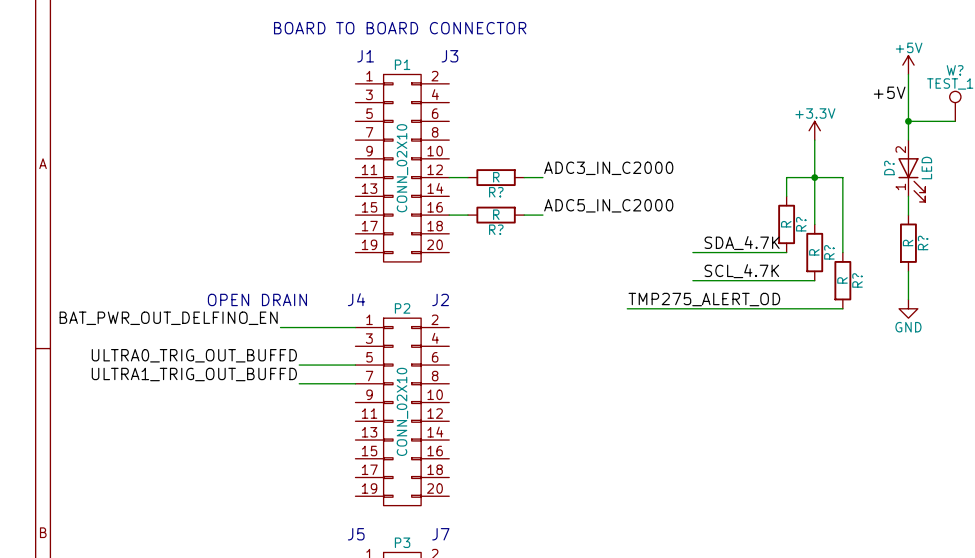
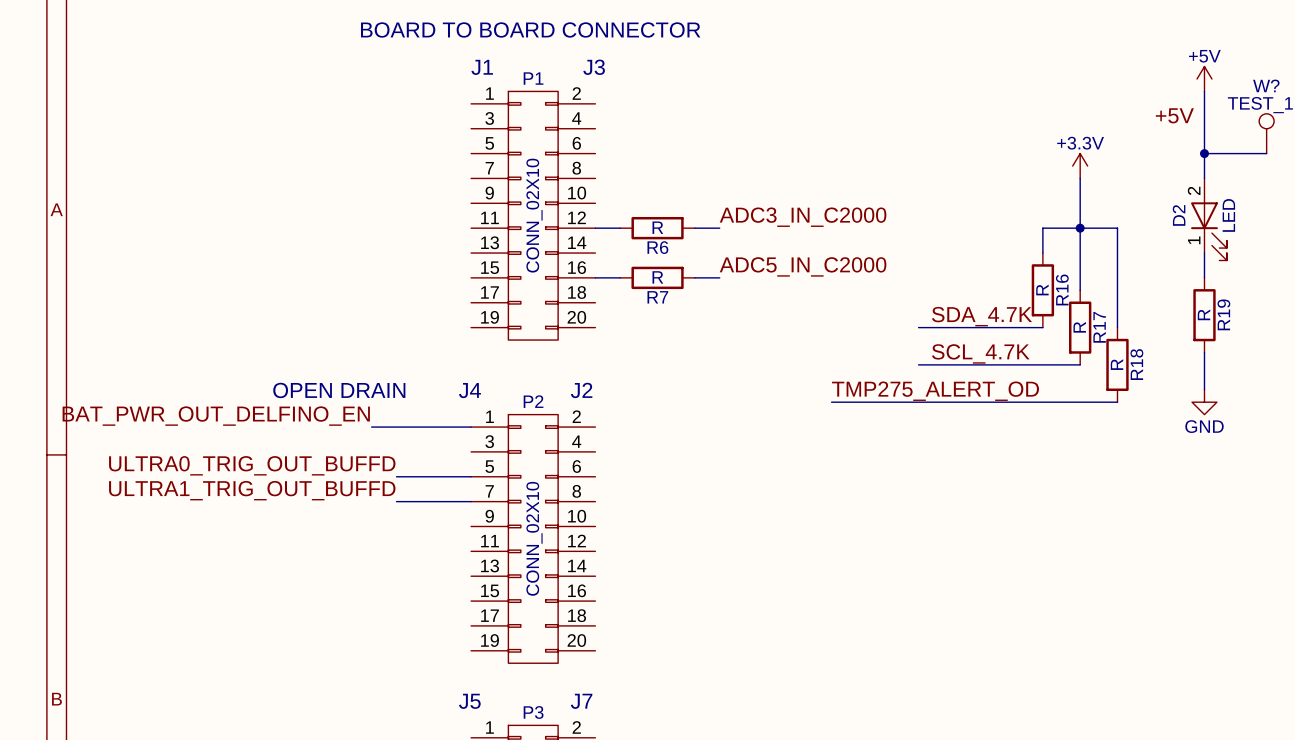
D? name: D? (889, 167) -> D2 (1179, 215)
R? name: R? (496, 192) -> R6 (657, 247)
R? name: R? (801, 224) -> R16 (1062, 289)
R? name: R? (496, 229) -> R7 (657, 297)
R? name: R? (923, 242) -> R19 (1223, 314)
R? name: R? (829, 252) -> R17 (1099, 327)
R? name: R? (857, 280) -> R18 (1136, 364)

